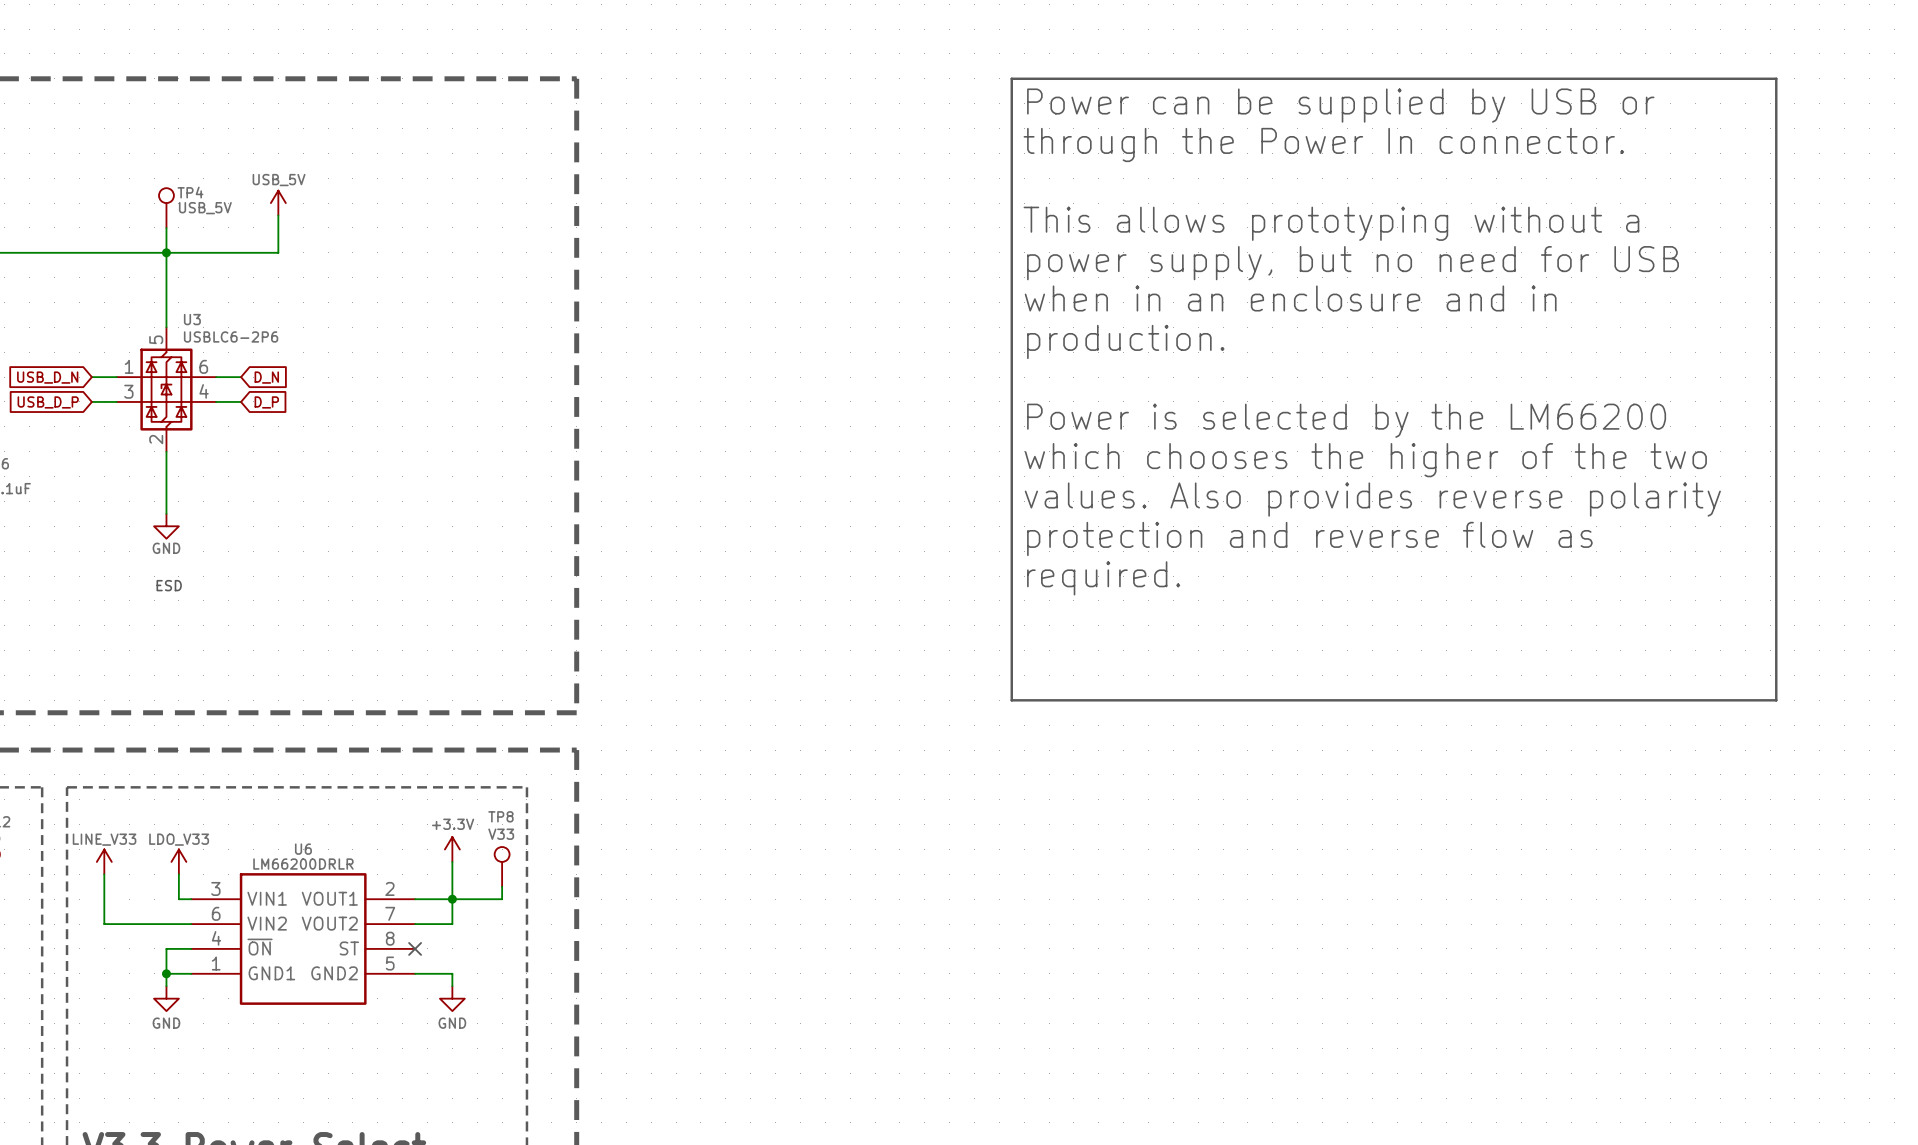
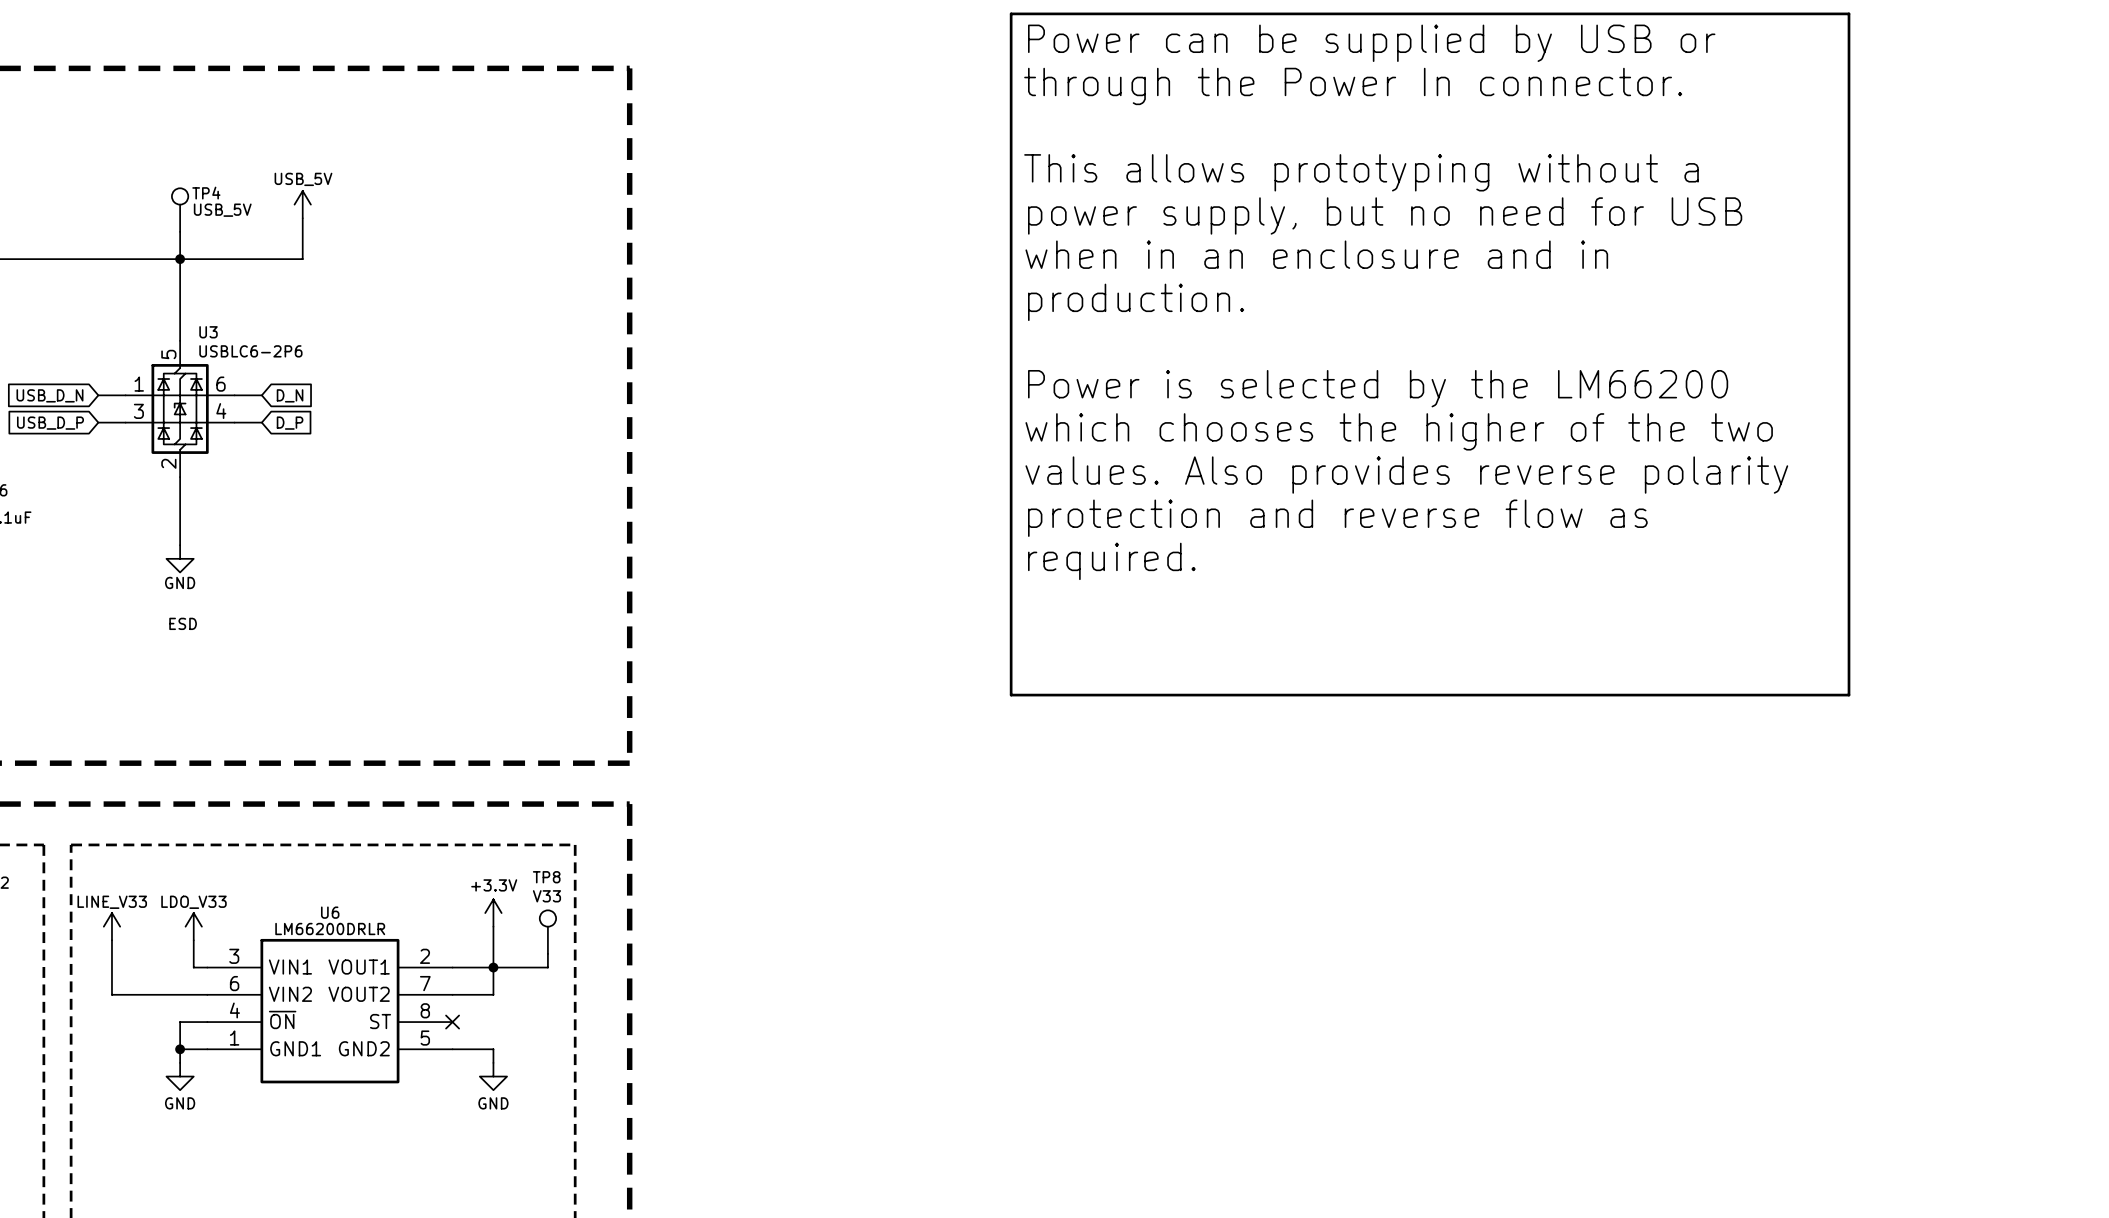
line: (1011, 78) (1776, 78) (1776, 700) (1011, 700) (1011, 78) -> (1011, 13) (1011, 695) (1848, 695) (1848, 13) (1011, 13)
text position: Power can be supplied by USB or (1340, 105) -> Power can be supplied by USB or (1371, 43)
text position: through the Power In connector. (1323, 144) -> through the Power In connector. (1353, 86)
text position: This allows prototyping without a (1331, 223) -> This allows prototyping without a (1361, 172)
text position: power supply, but no need for USB (1353, 263) -> power supply, but no need for USB (1385, 215)
text position: when in an enclosure and in (1290, 298) -> when in an enclosure and in (1316, 254)
text position: production. (1125, 341) -> production. (1136, 302)
text position: Power is selected by the LM66200 (1346, 420) -> Power is selected by the LM66200 (1378, 388)
text position: which chooses the higher of the two (1365, 460) -> which chooses the higher of the two (1399, 431)
text position: values. Also provides reverse polarity (1372, 499) -> values. Also provides reverse polarity (1406, 475)
text position: protection and reverse flow as (1309, 538) -> protection and reverse flow as (1337, 518)
text position: required. (1103, 578) -> required. (1111, 561)

